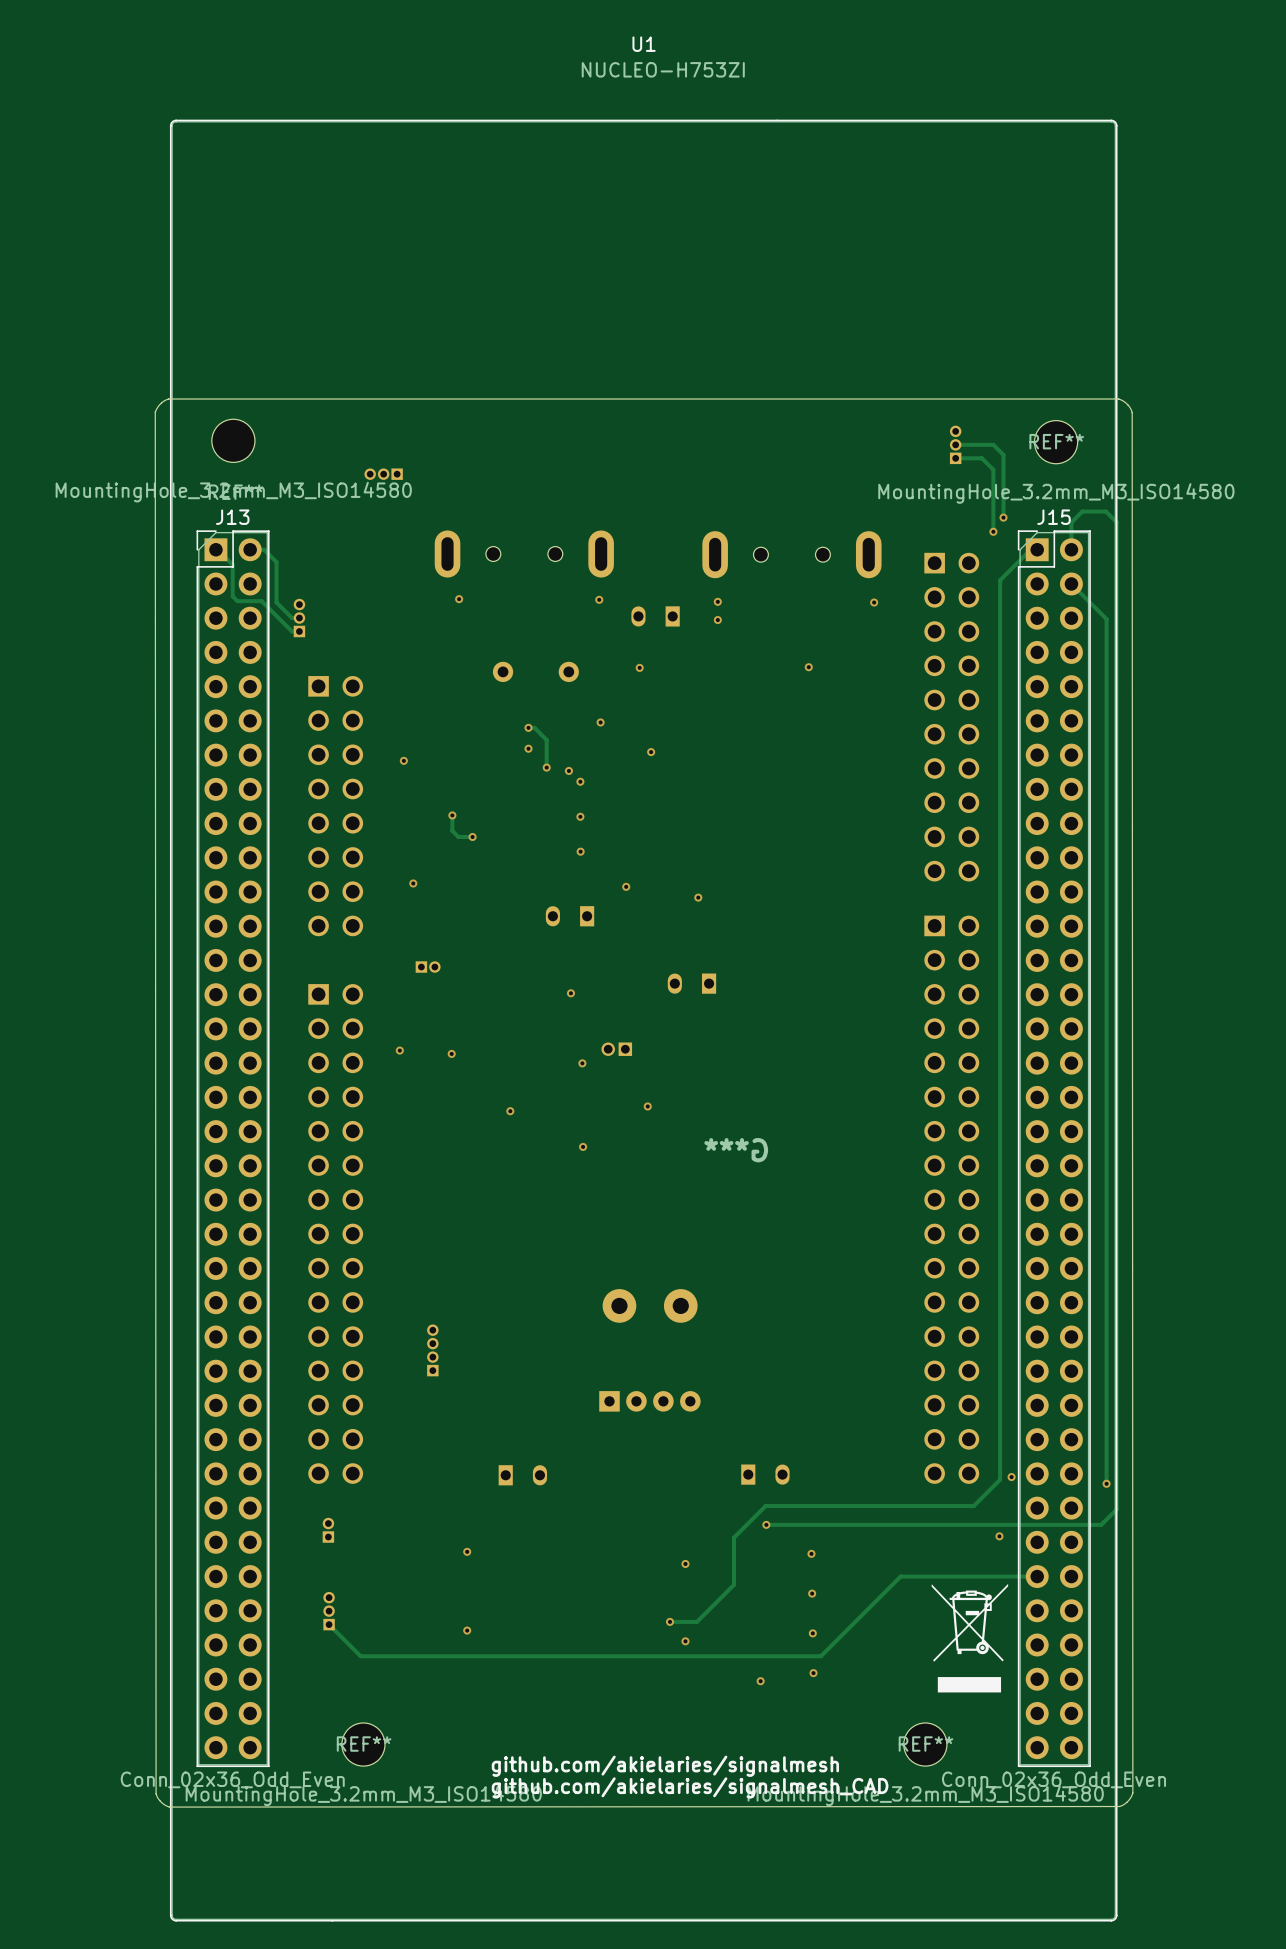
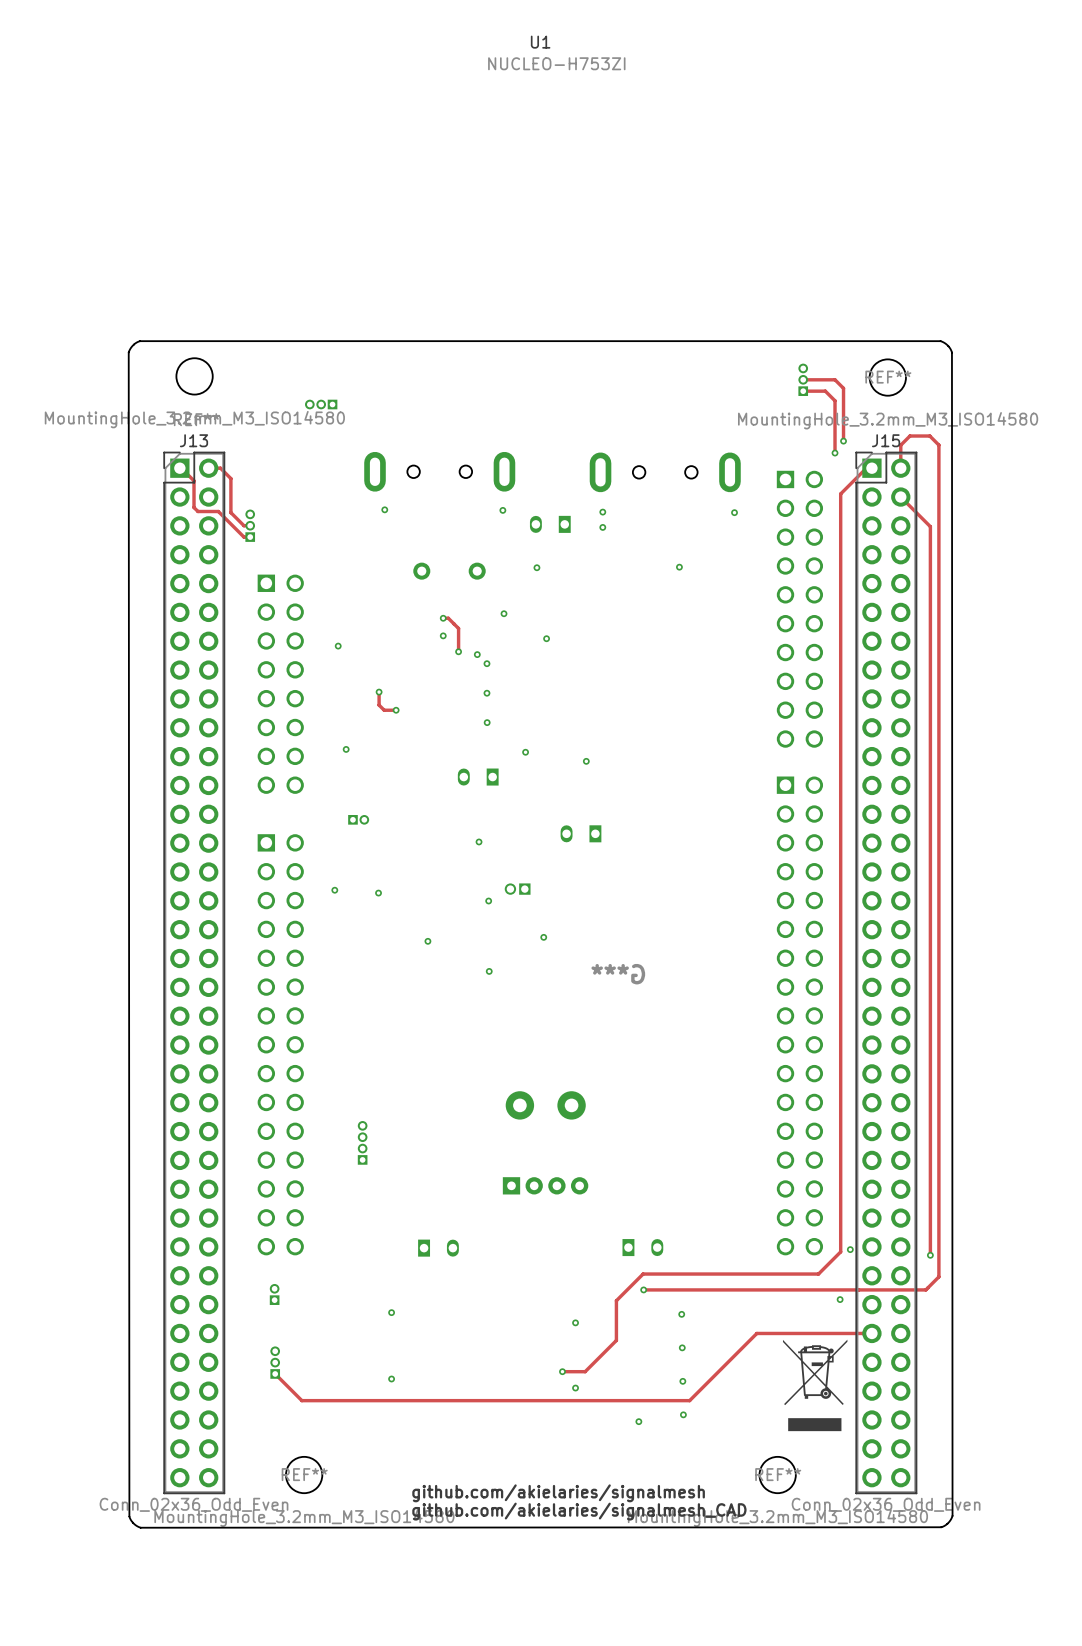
U1 footprint: [169, 119, 1118, 1922] -> [257, 470, 824, 1256]

